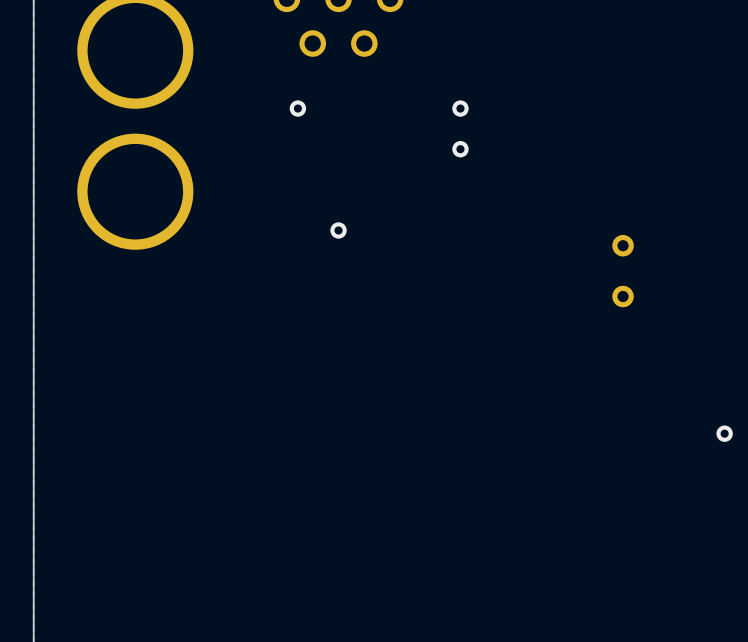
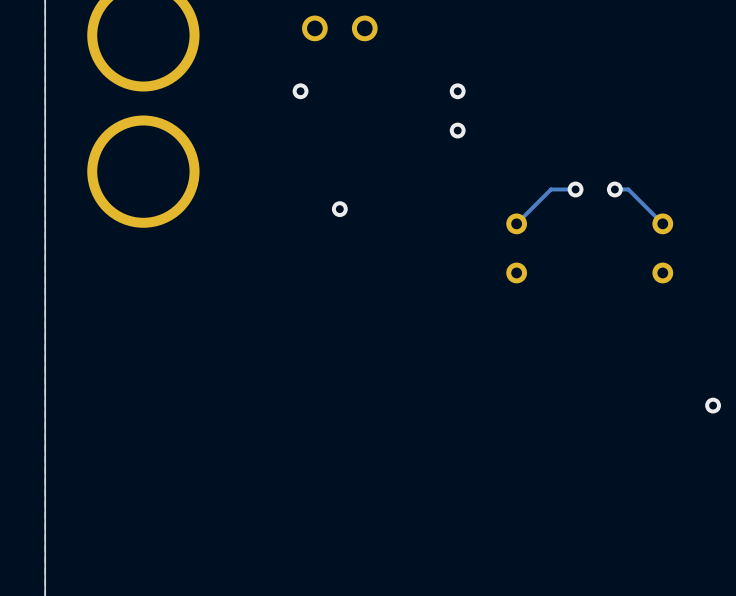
track: none -> (575, 189) (551, 189) (516, 223)
via: none -> (575, 189)
track: none -> (614, 189) (628, 189) (662, 223)
via: none -> (614, 189)
part: none -> (516, 248)
part position: (623, 271) -> (662, 248)

